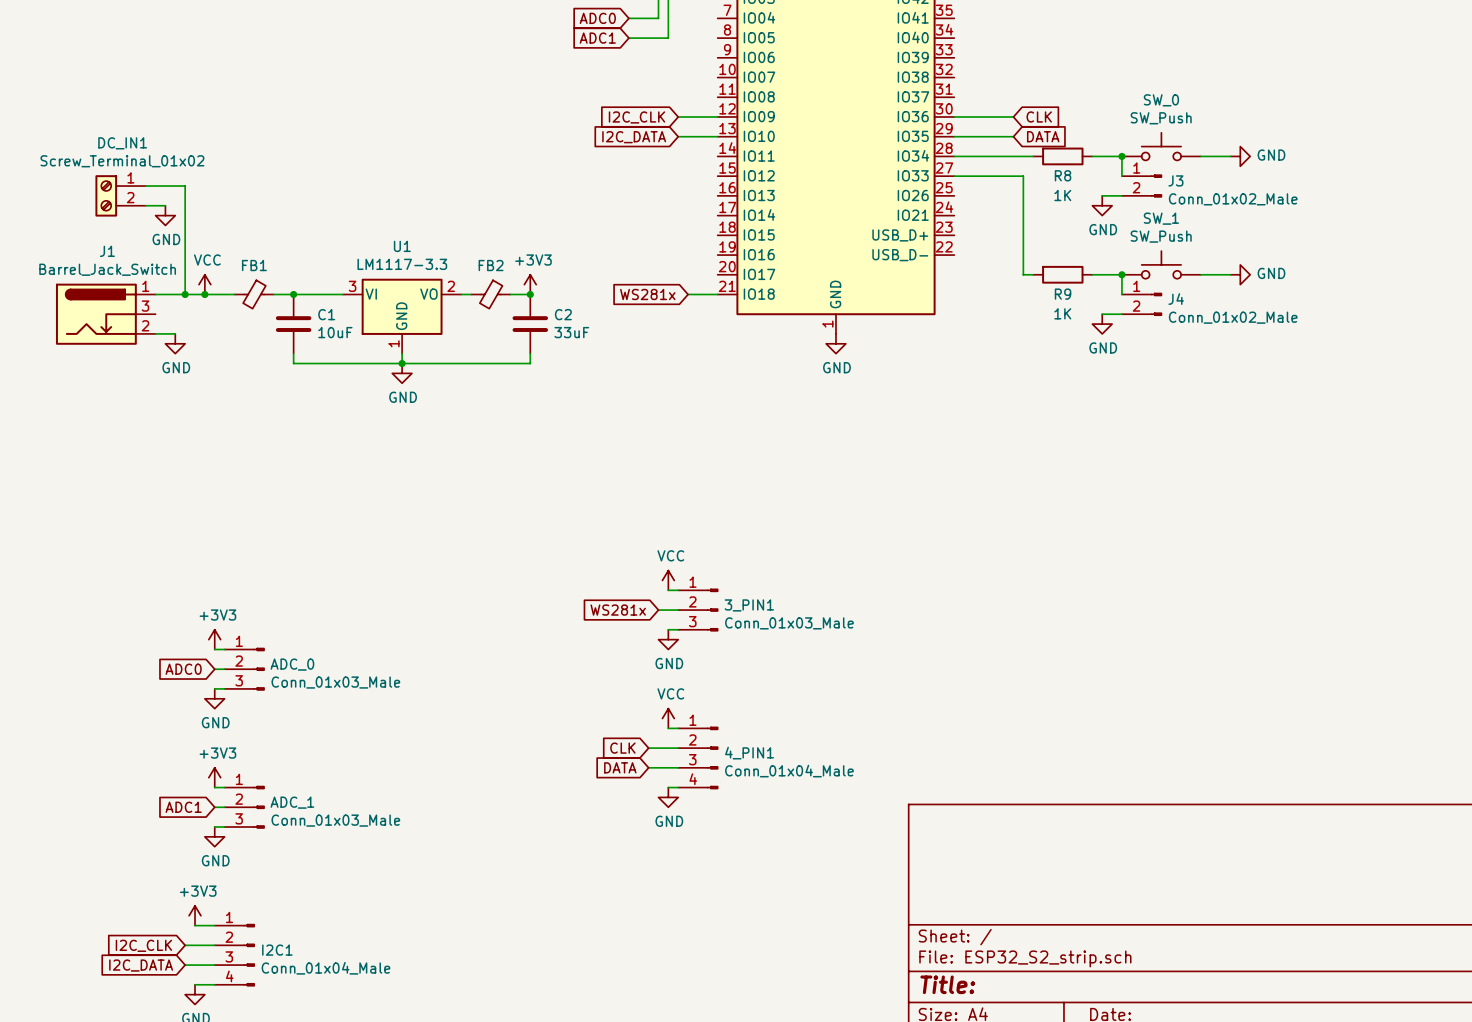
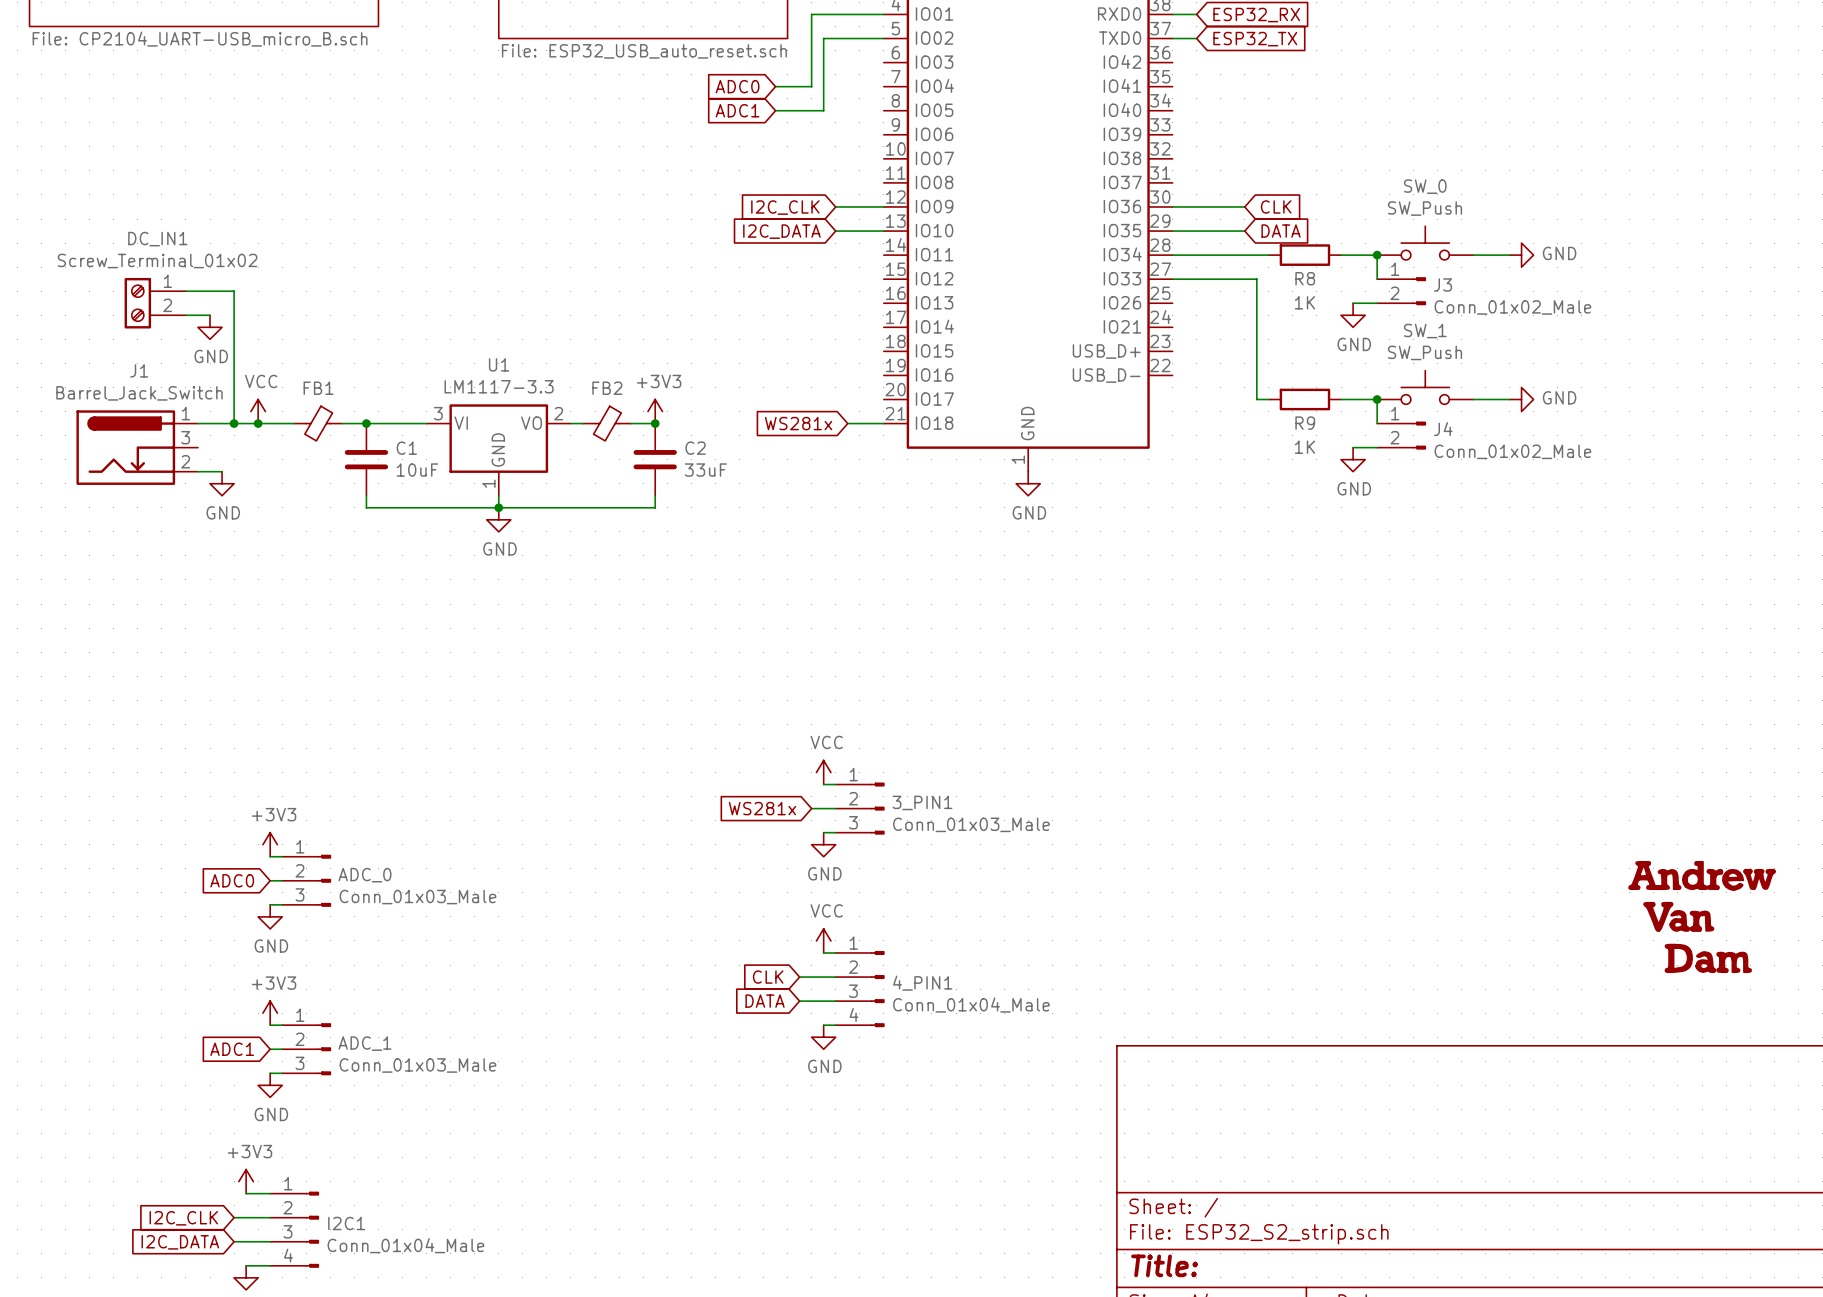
power symbol: none -> (1702, 917)

